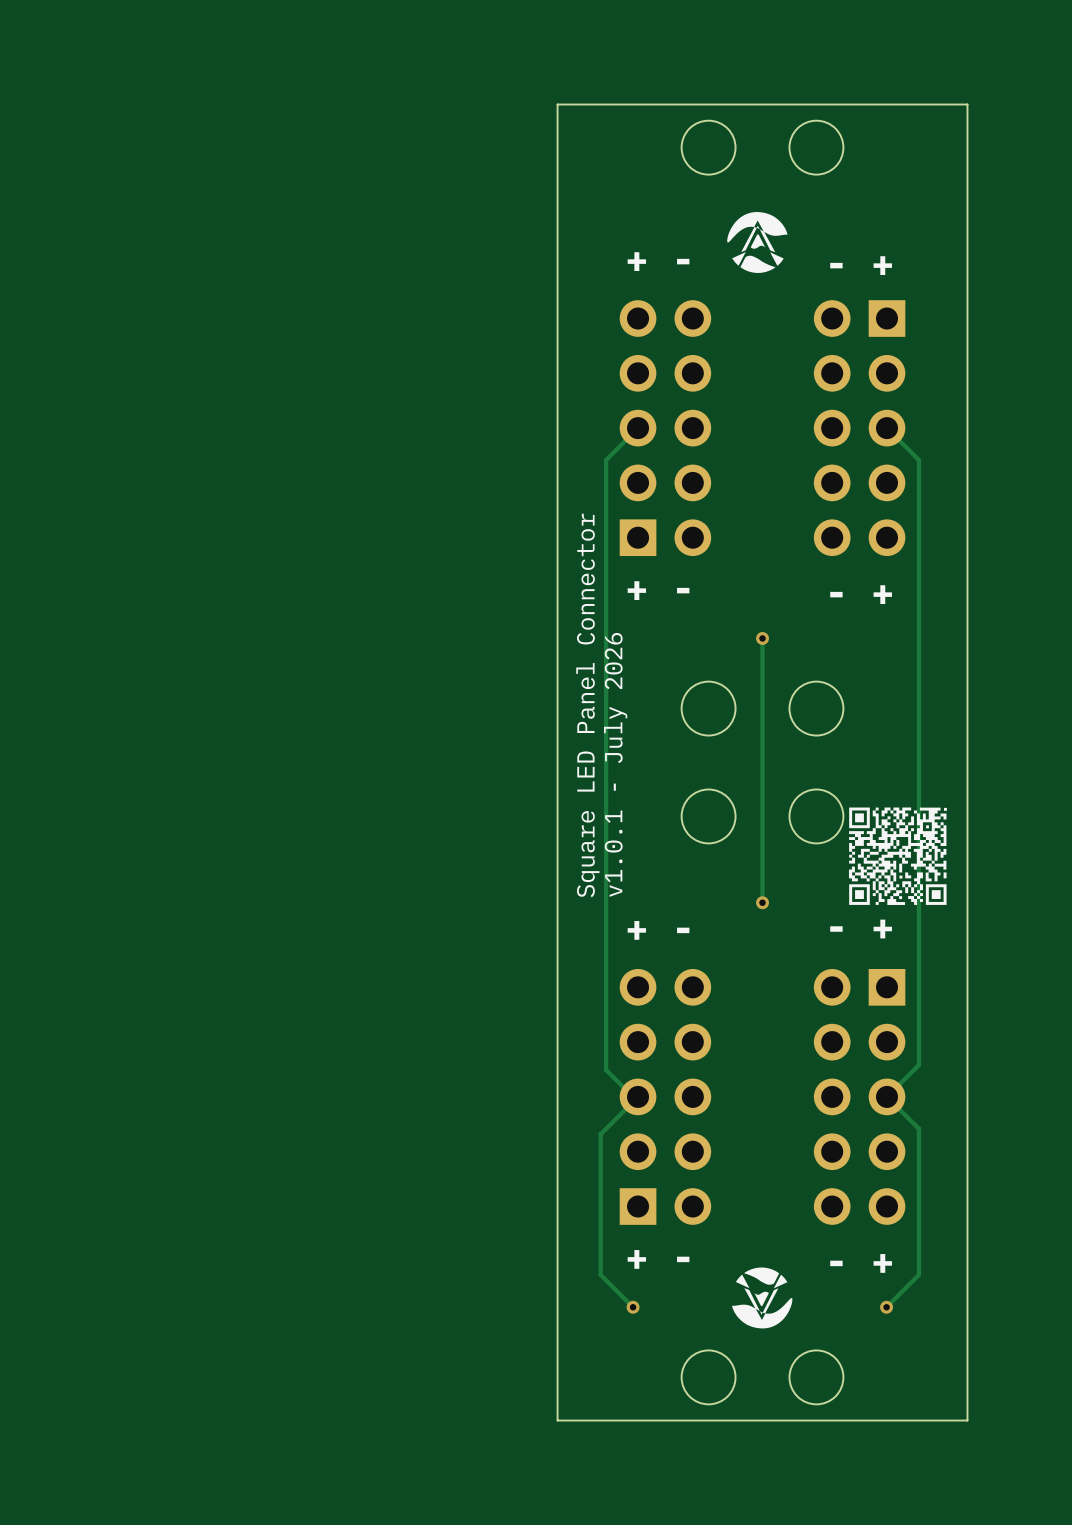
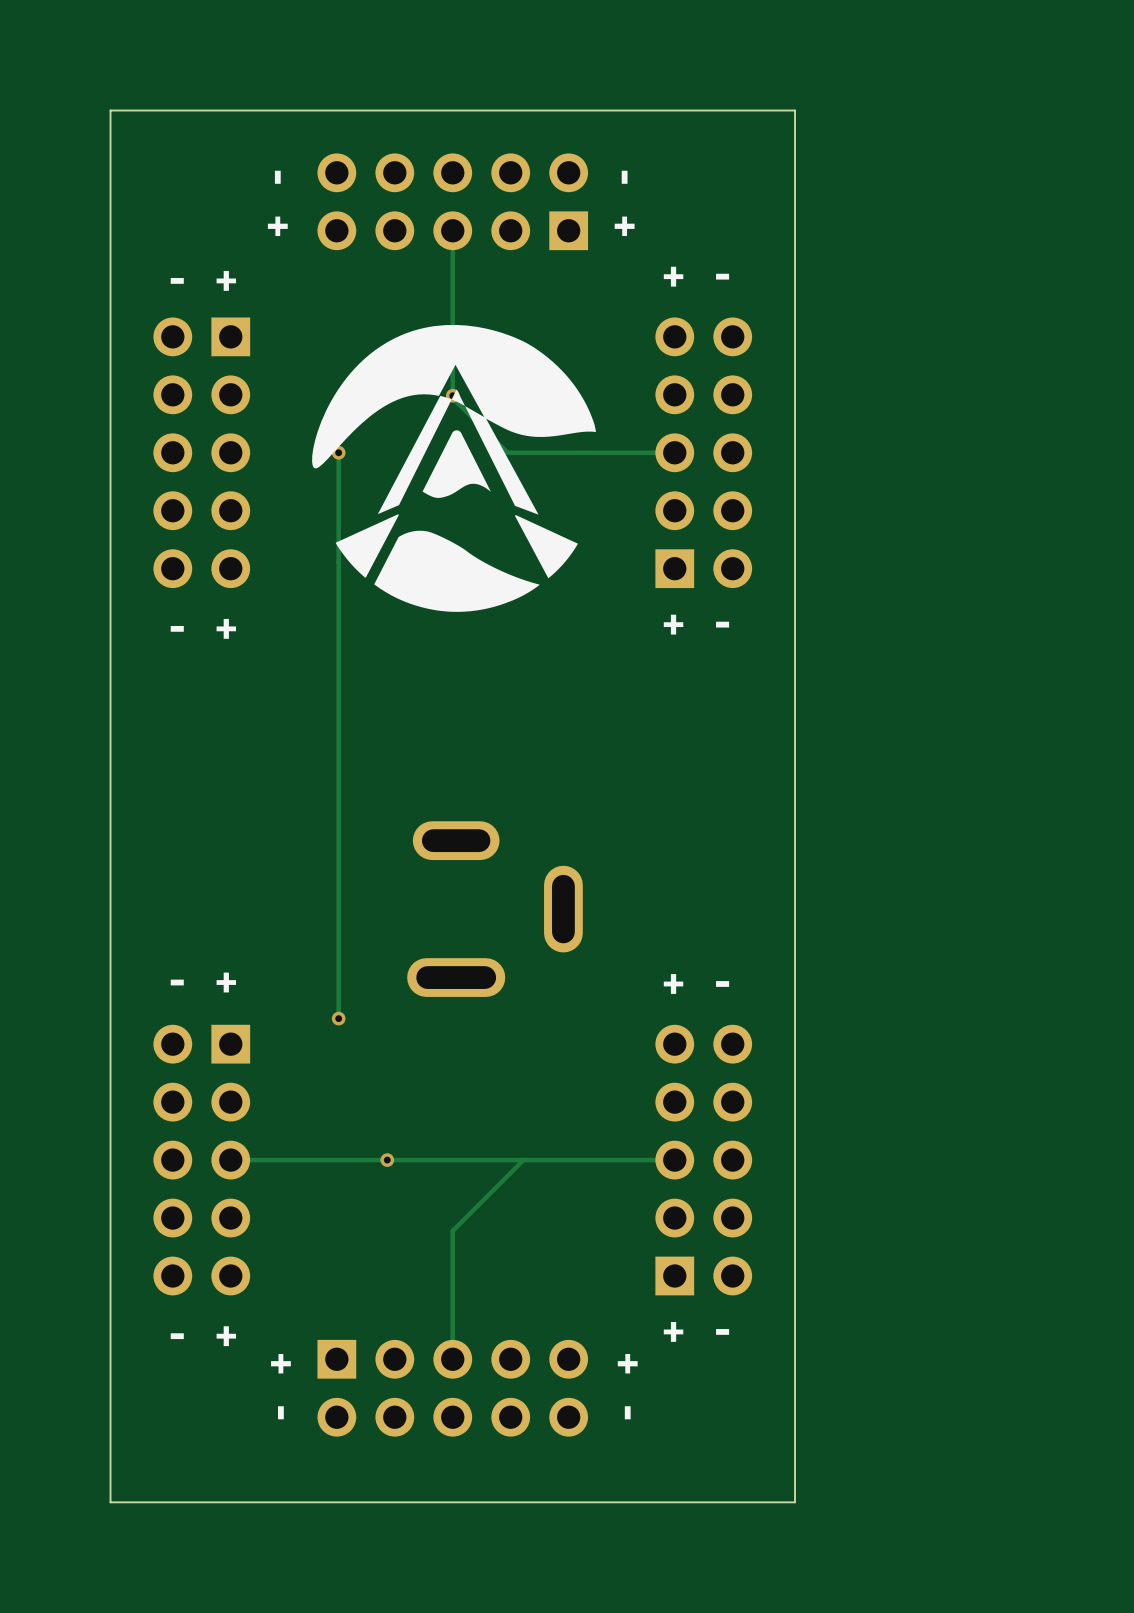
board edge: (557, 104) (557, 1420) -> (589, 110) (110, 110) (110, 1502) (589, 1502)
board edge: (751, 104) (967, 104) (967, 1420) (751, 1420) -> (795, 110) (795, 1502)
round board edge: [681, 120, 737, 176] -> none
round board edge: [788, 120, 844, 176] -> none
part: none -> (452, 201)
text: none -> + - (277, 203)
text: none -> + - (624, 203)
drawing: [727, 212, 788, 273] -> none
track: none -> (452, 230) (452, 398) (507, 452) (674, 452)
text: none -> + - (203, 280)
text: + - (861, 265) -> none
drawing: none -> [312, 324, 597, 612]
via: none -> (452, 395)
part: none -> (201, 452)
track: none -> (338, 452) (338, 1018)
via: none -> (338, 452)
track: (638, 428) (606, 460) (606, 1069) (633, 1096) -> (230, 1160) (669, 1160)
part: (859, 428) -> none
track: (887, 428) (918, 460) (918, 1064) (887, 1096) (918, 1128) (918, 1274) (886, 1307) -> none
text: none -> + - (203, 628)
text: + - (861, 594) -> none
track: (762, 638) (762, 902) -> none
via: (762, 638) -> none
round board edge: [681, 681, 737, 737] -> none
round board edge: [788, 681, 844, 737] -> none
text: Square LED Panel Connector (587, 705) -> none
text: v1.0.1 - July 2026 (615, 764) -> none
round board edge: [681, 788, 737, 844] -> none
round board edge: [788, 788, 844, 844] -> none
drawing: [848, 807, 947, 905] -> none
part: none -> (494, 909)
via: (762, 902) -> none
text: none -> + - (203, 982)
text: + - (861, 929) -> none
via: none -> (338, 1018)
part: none -> (201, 1160)
via: none -> (387, 1160)
track: none -> (523, 1160) (452, 1230) (452, 1359)
track: (638, 1096) (600, 1134) (600, 1274) (633, 1307) -> none
part: (859, 1096) -> none
text: none -> + - (203, 1336)
text: + - (861, 1263) -> none
drawing: [732, 1267, 793, 1329] -> none
via: (633, 1307) -> none
via: (886, 1307) -> none
text: none -> + - (280, 1386)
text: none -> + - (627, 1386)
part: none -> (452, 1388)
round board edge: [681, 1349, 737, 1405] -> none
round board edge: [788, 1349, 844, 1405] -> none

